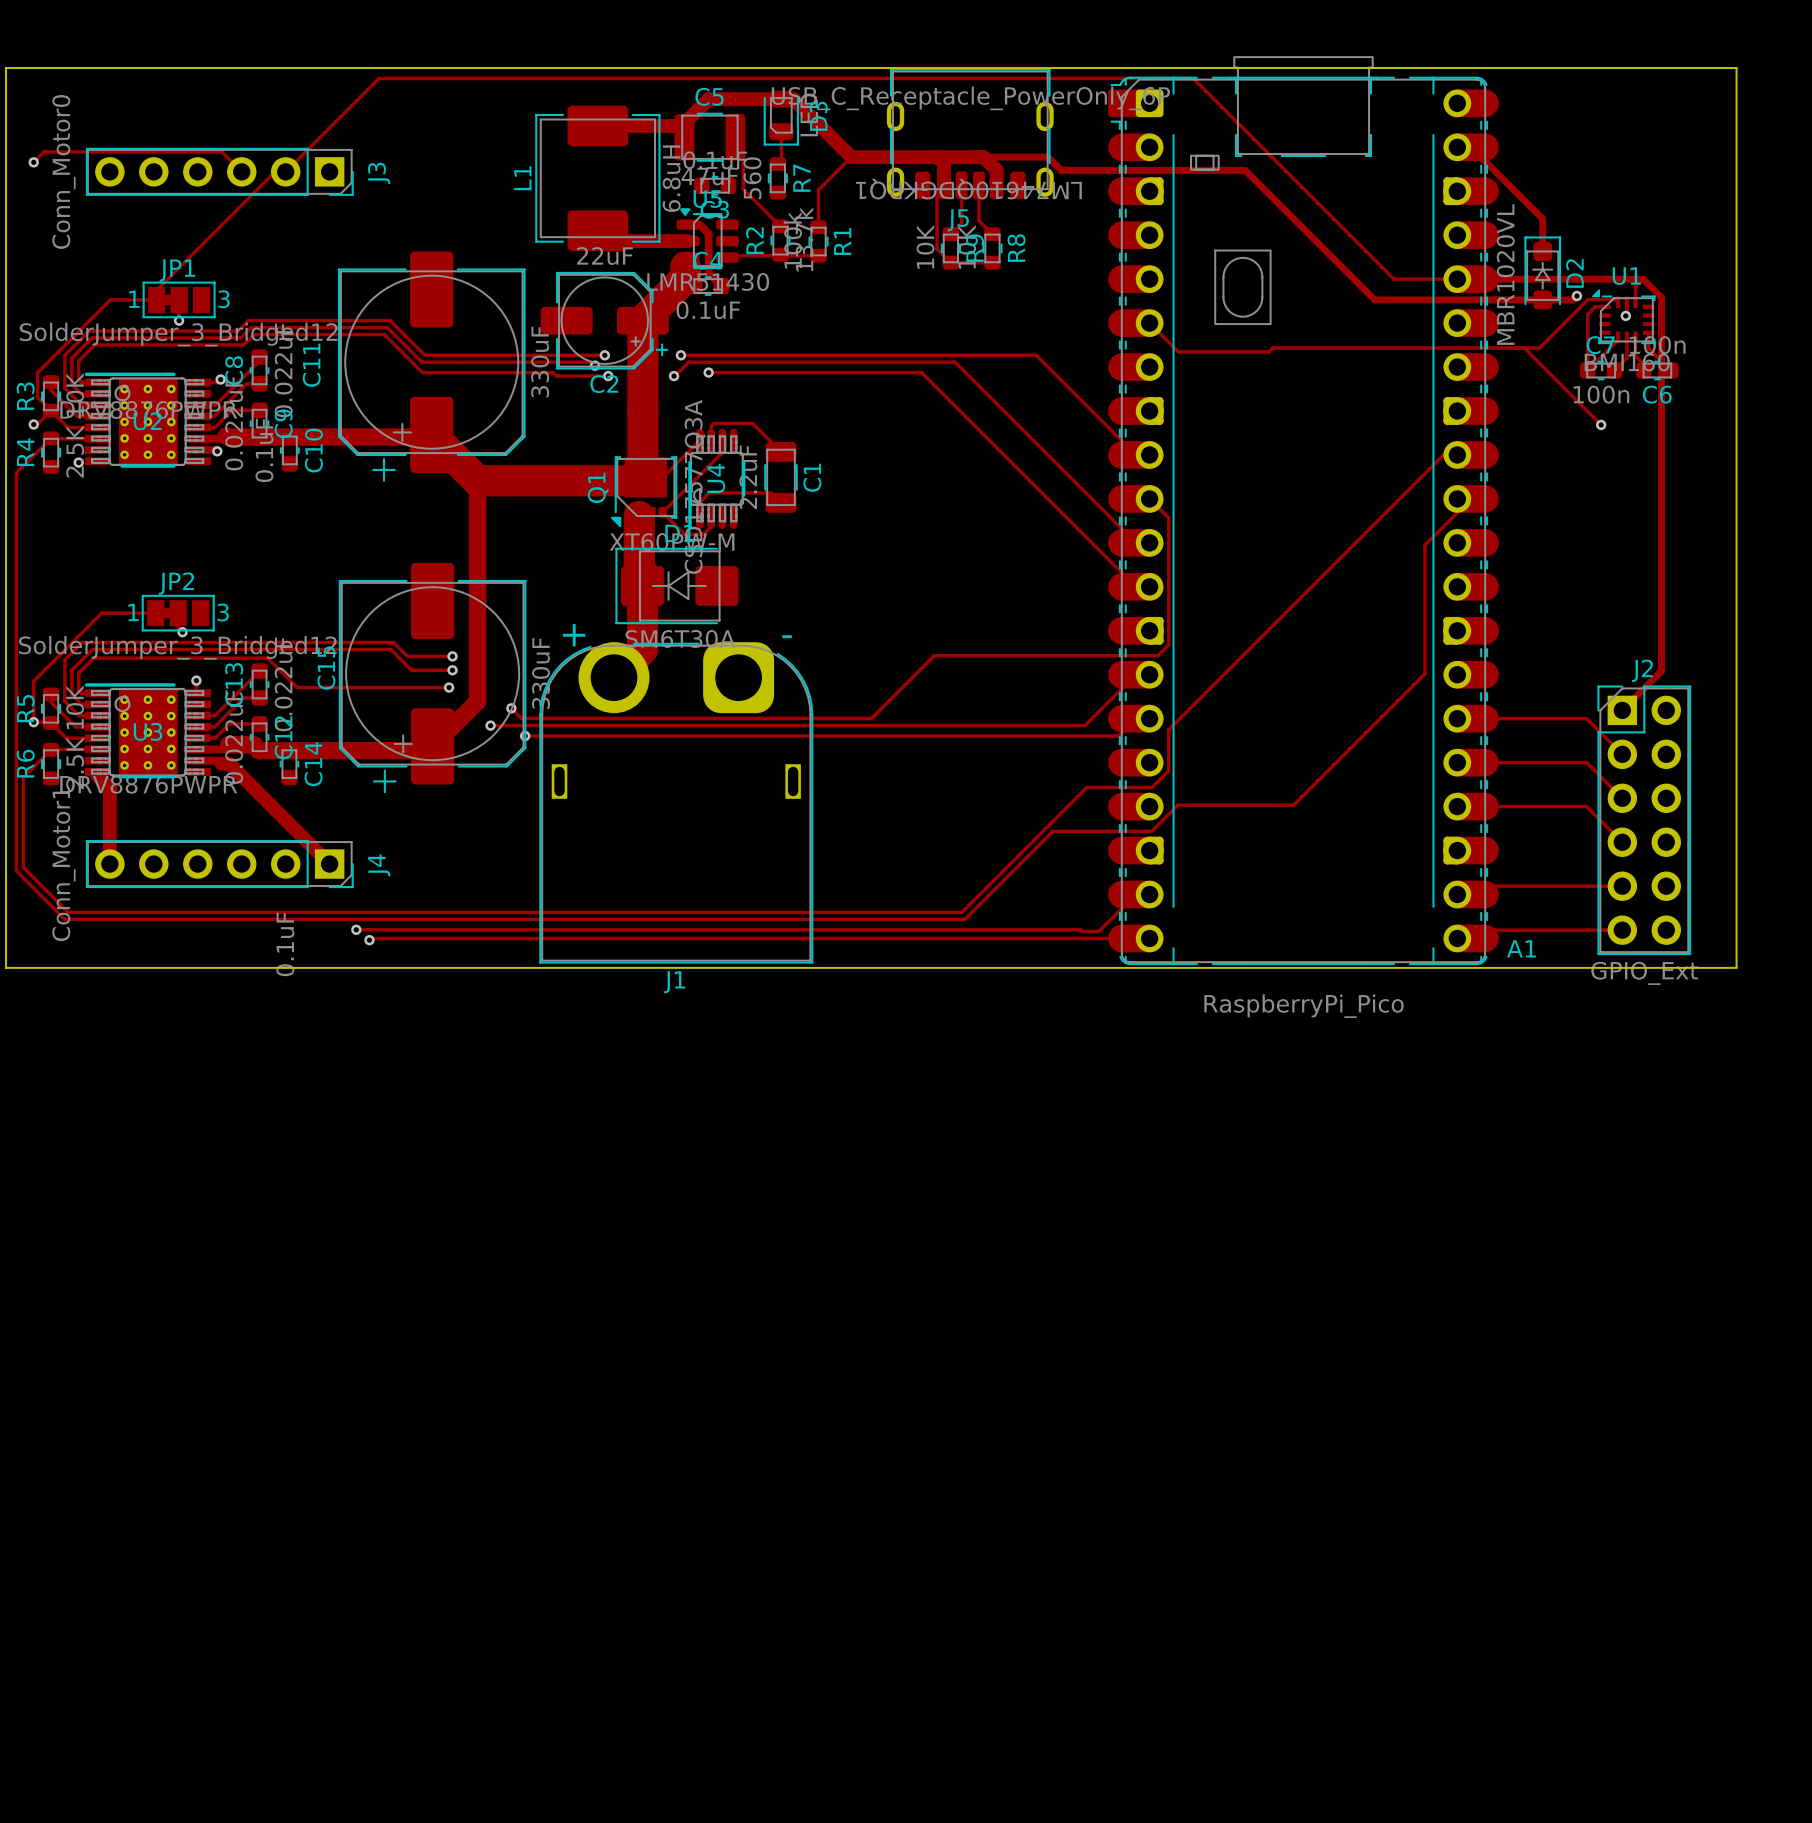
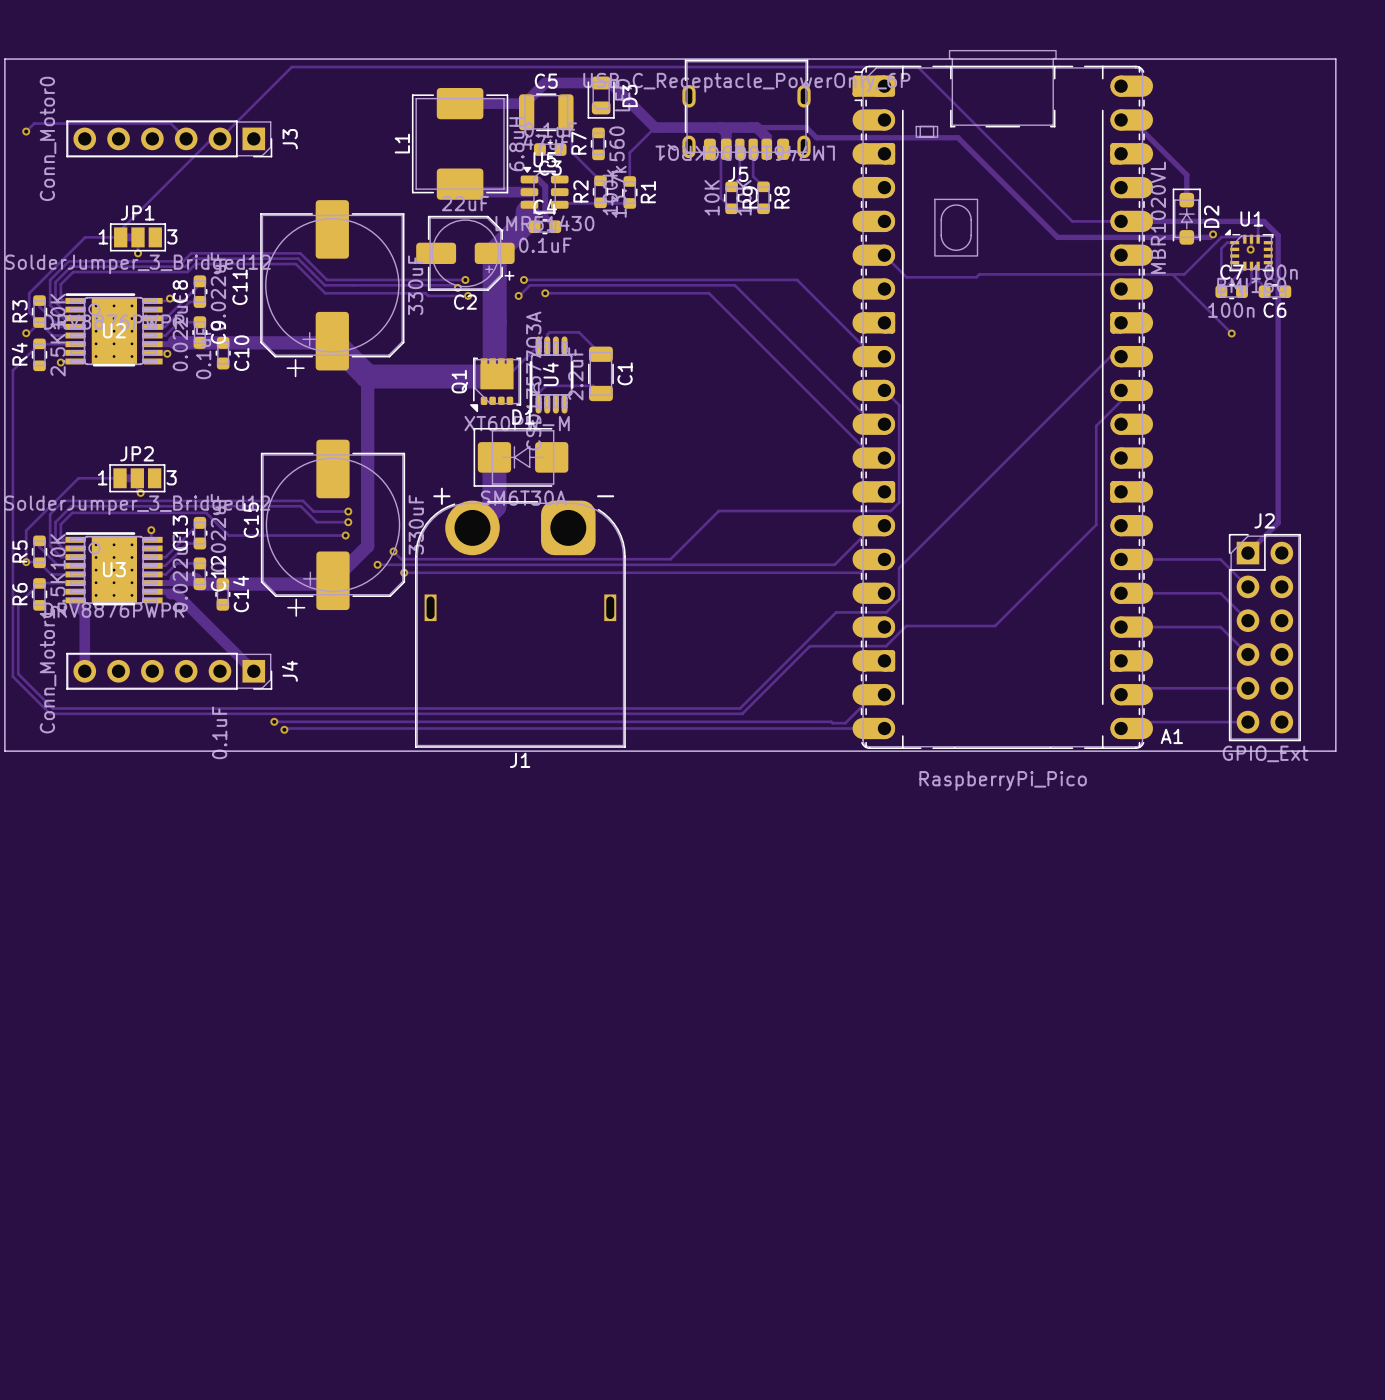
track: (781, 131) (781, 160) (777, 164) -> none
R7 value position: 560 (752, 178) -> 560 (617, 143)
R7 name position: R7 (801, 178) -> R7 (578, 143)
track: (722, 440) (722, 452) (662, 512) (684, 534) (703, 534) (711, 526) (711, 517) -> none
track: (639, 516) (639, 569) (642, 573) (642, 585) -> none

